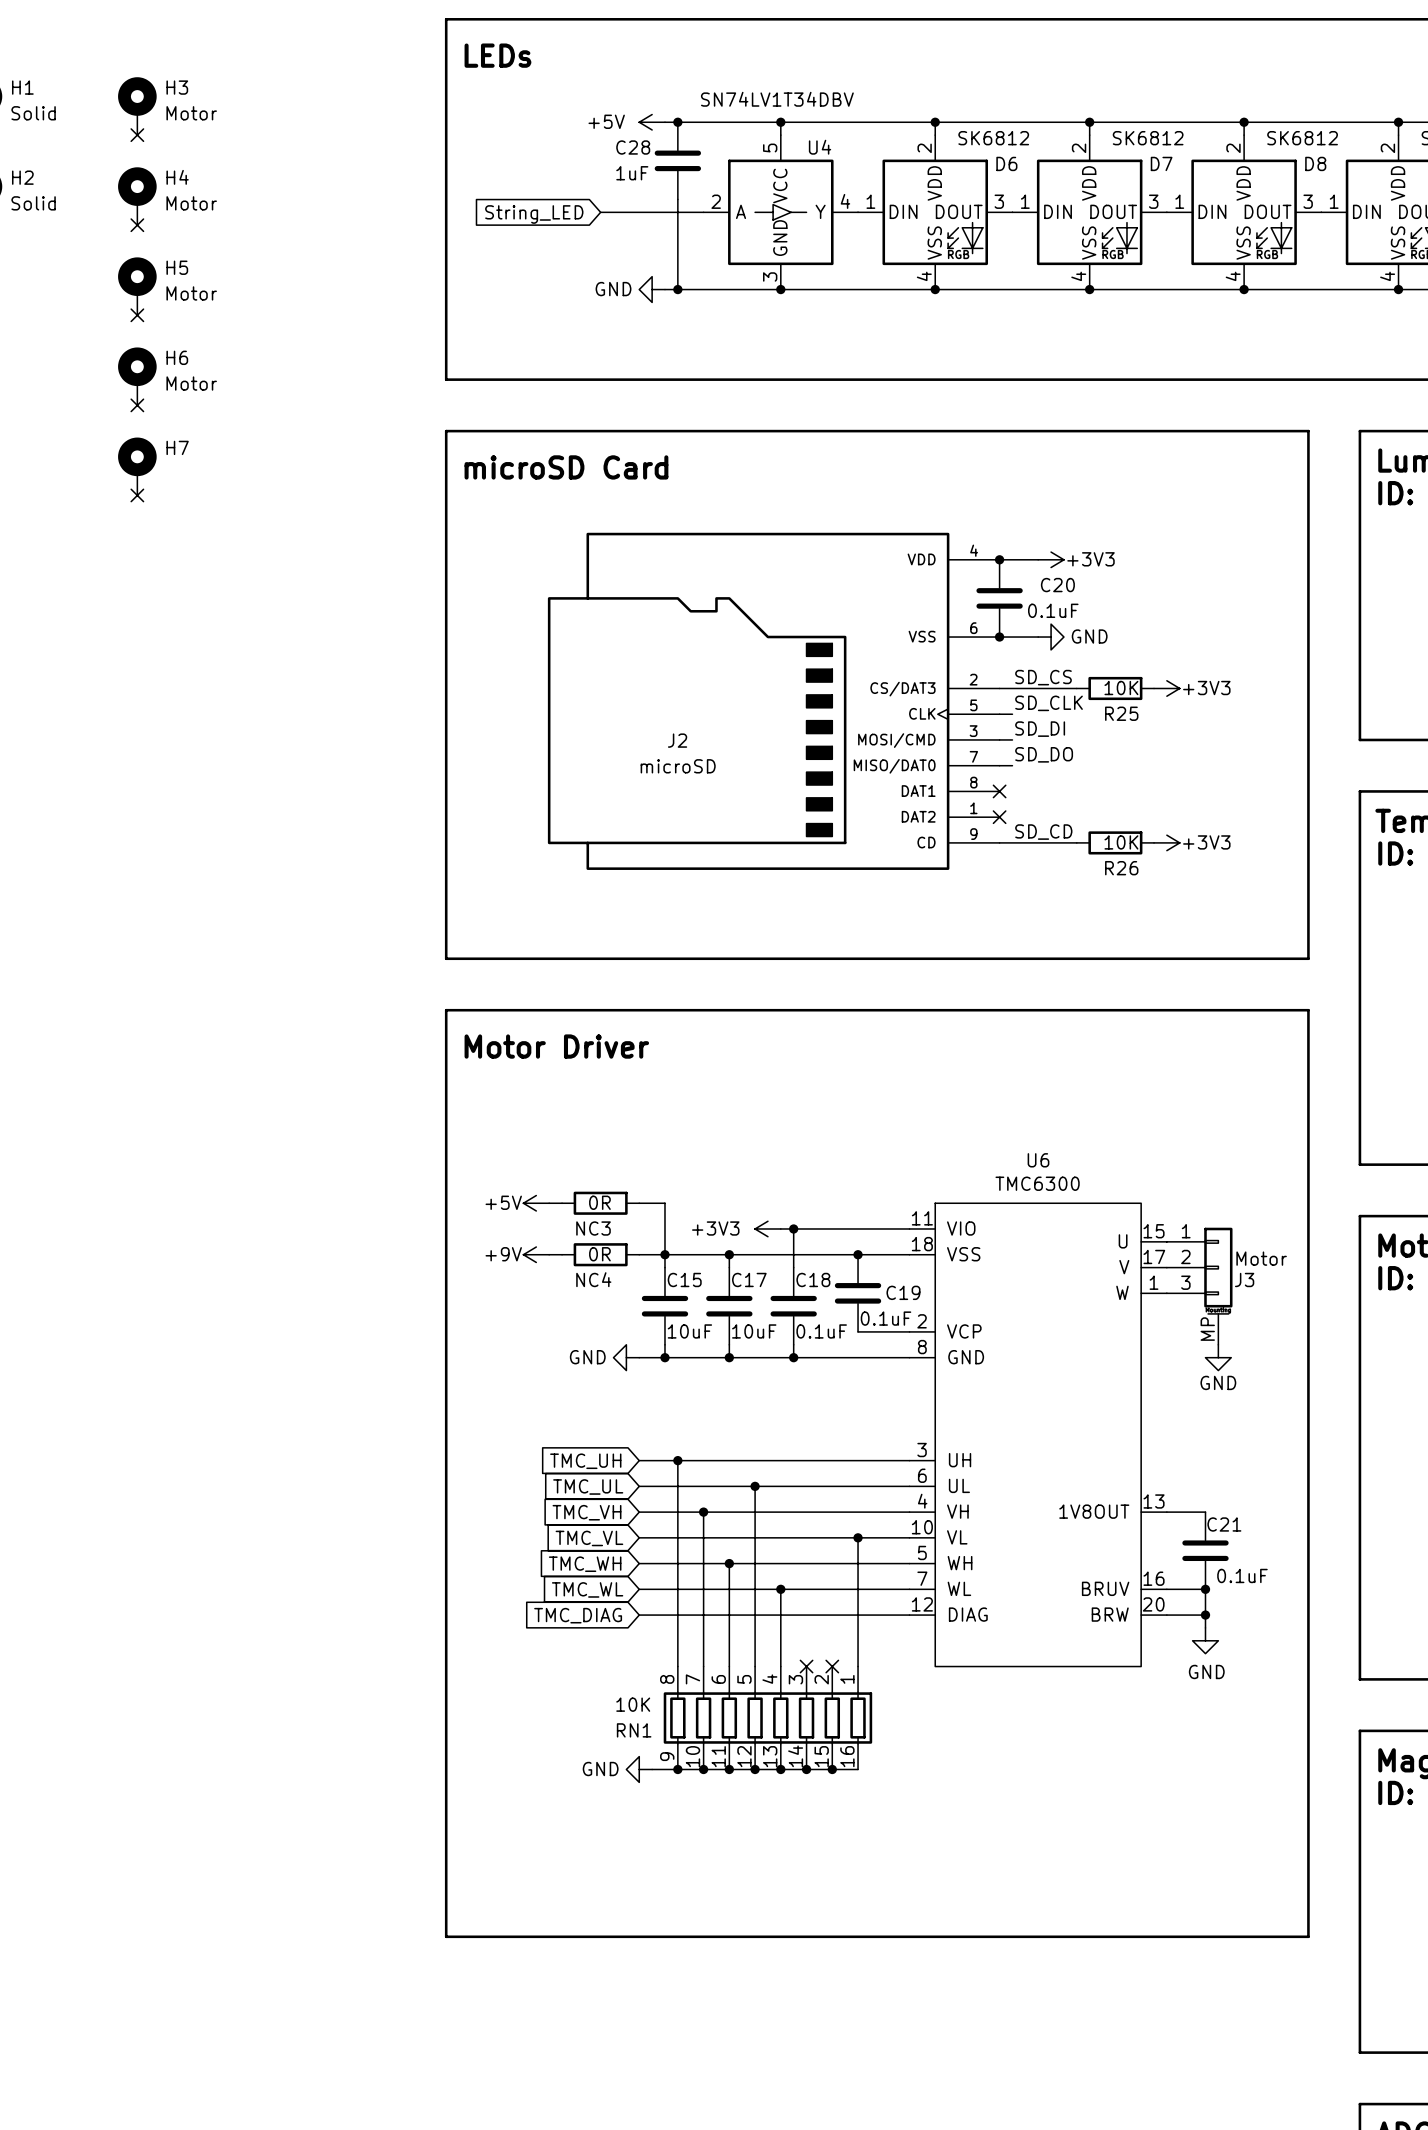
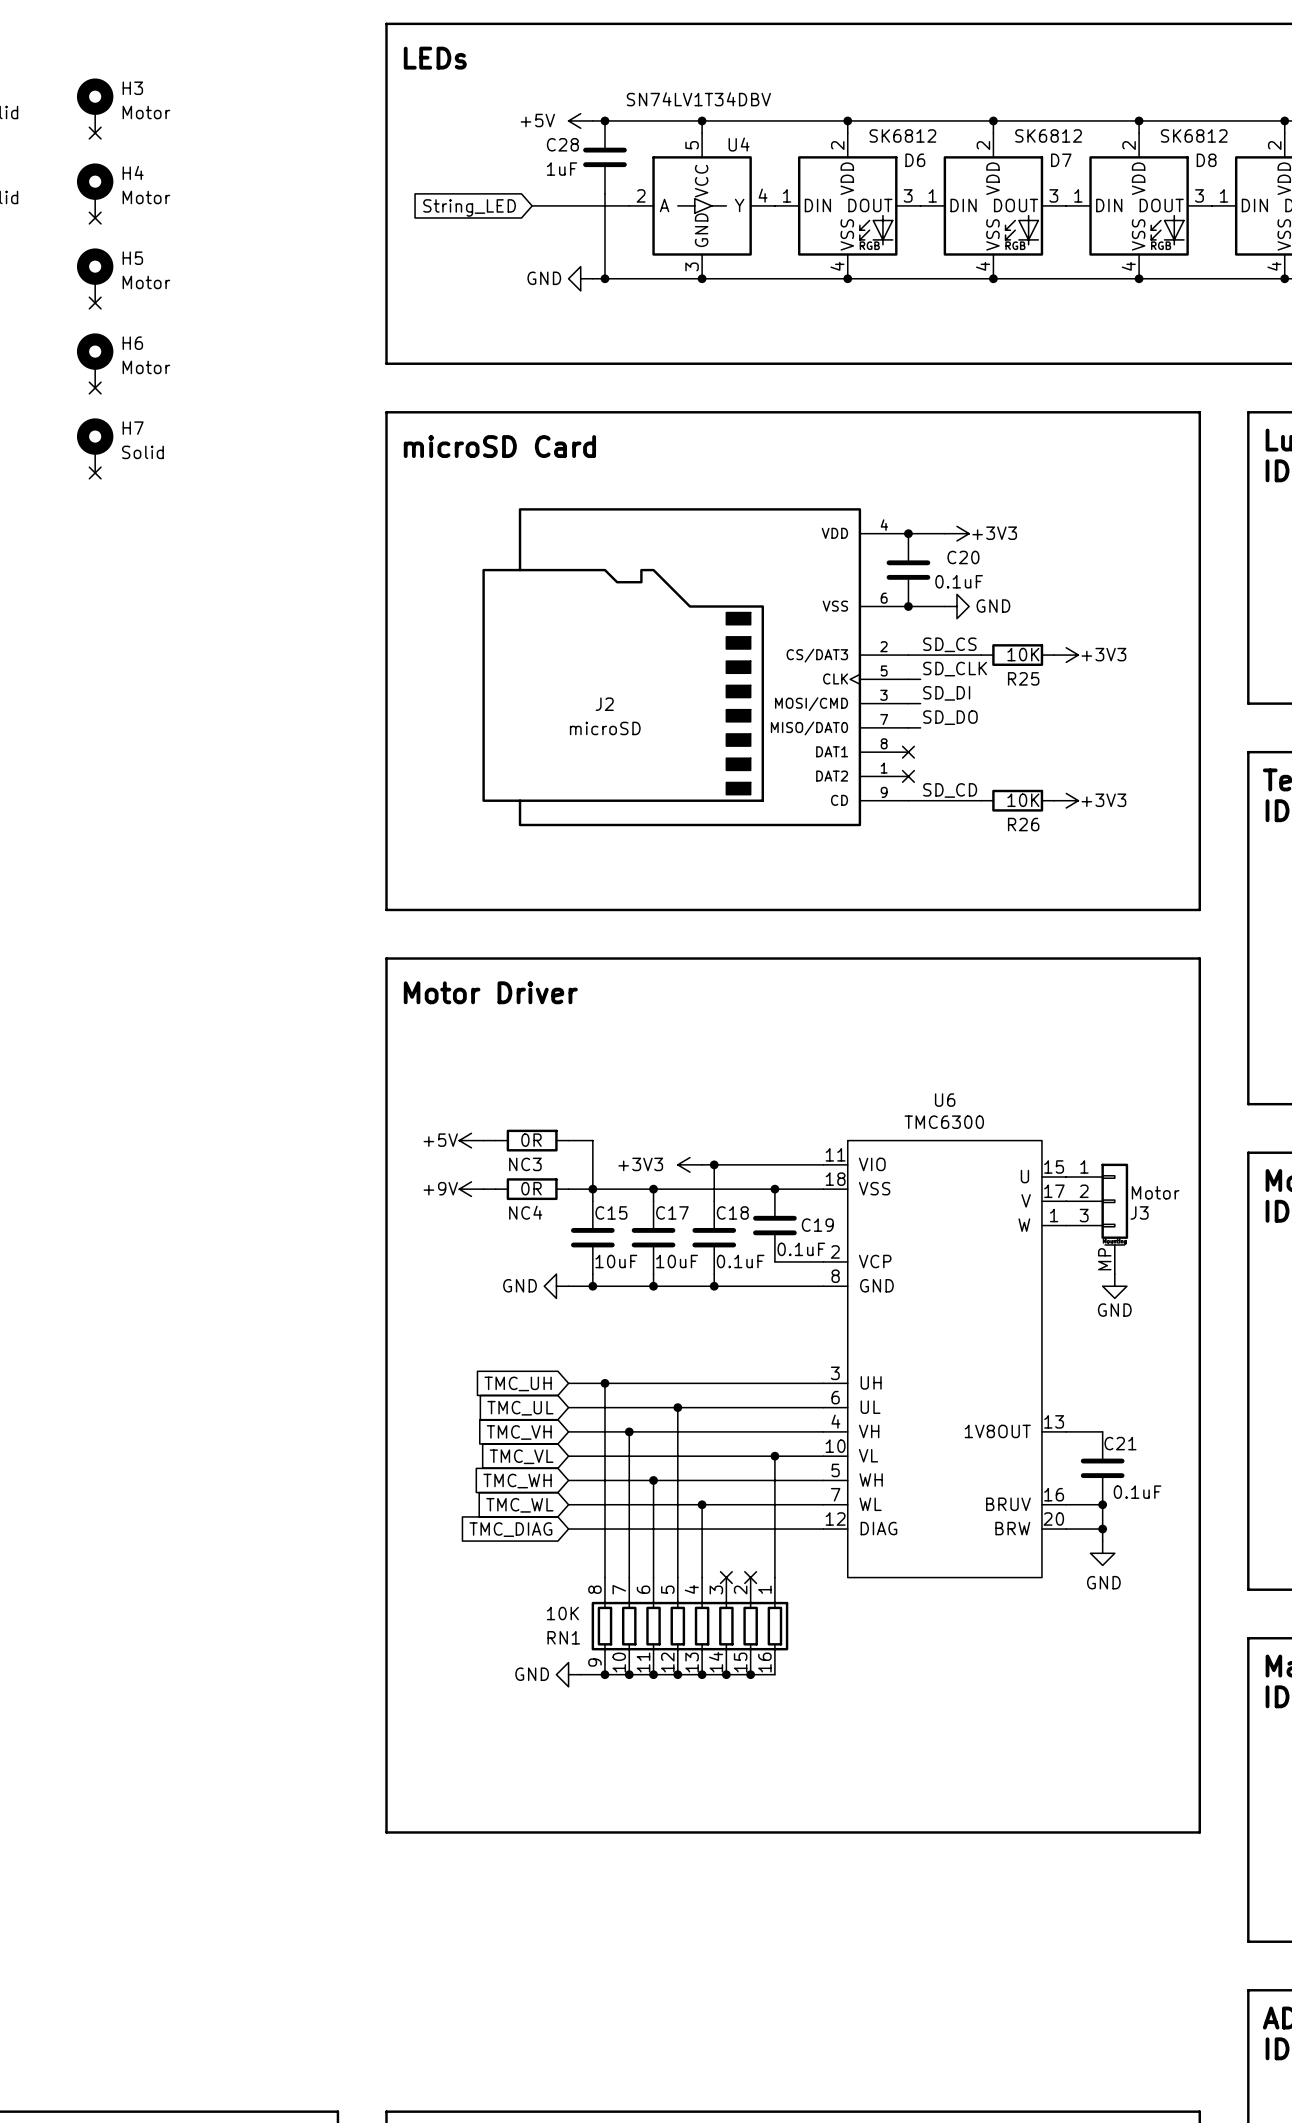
H7 value: none -> Solid (142, 452)

